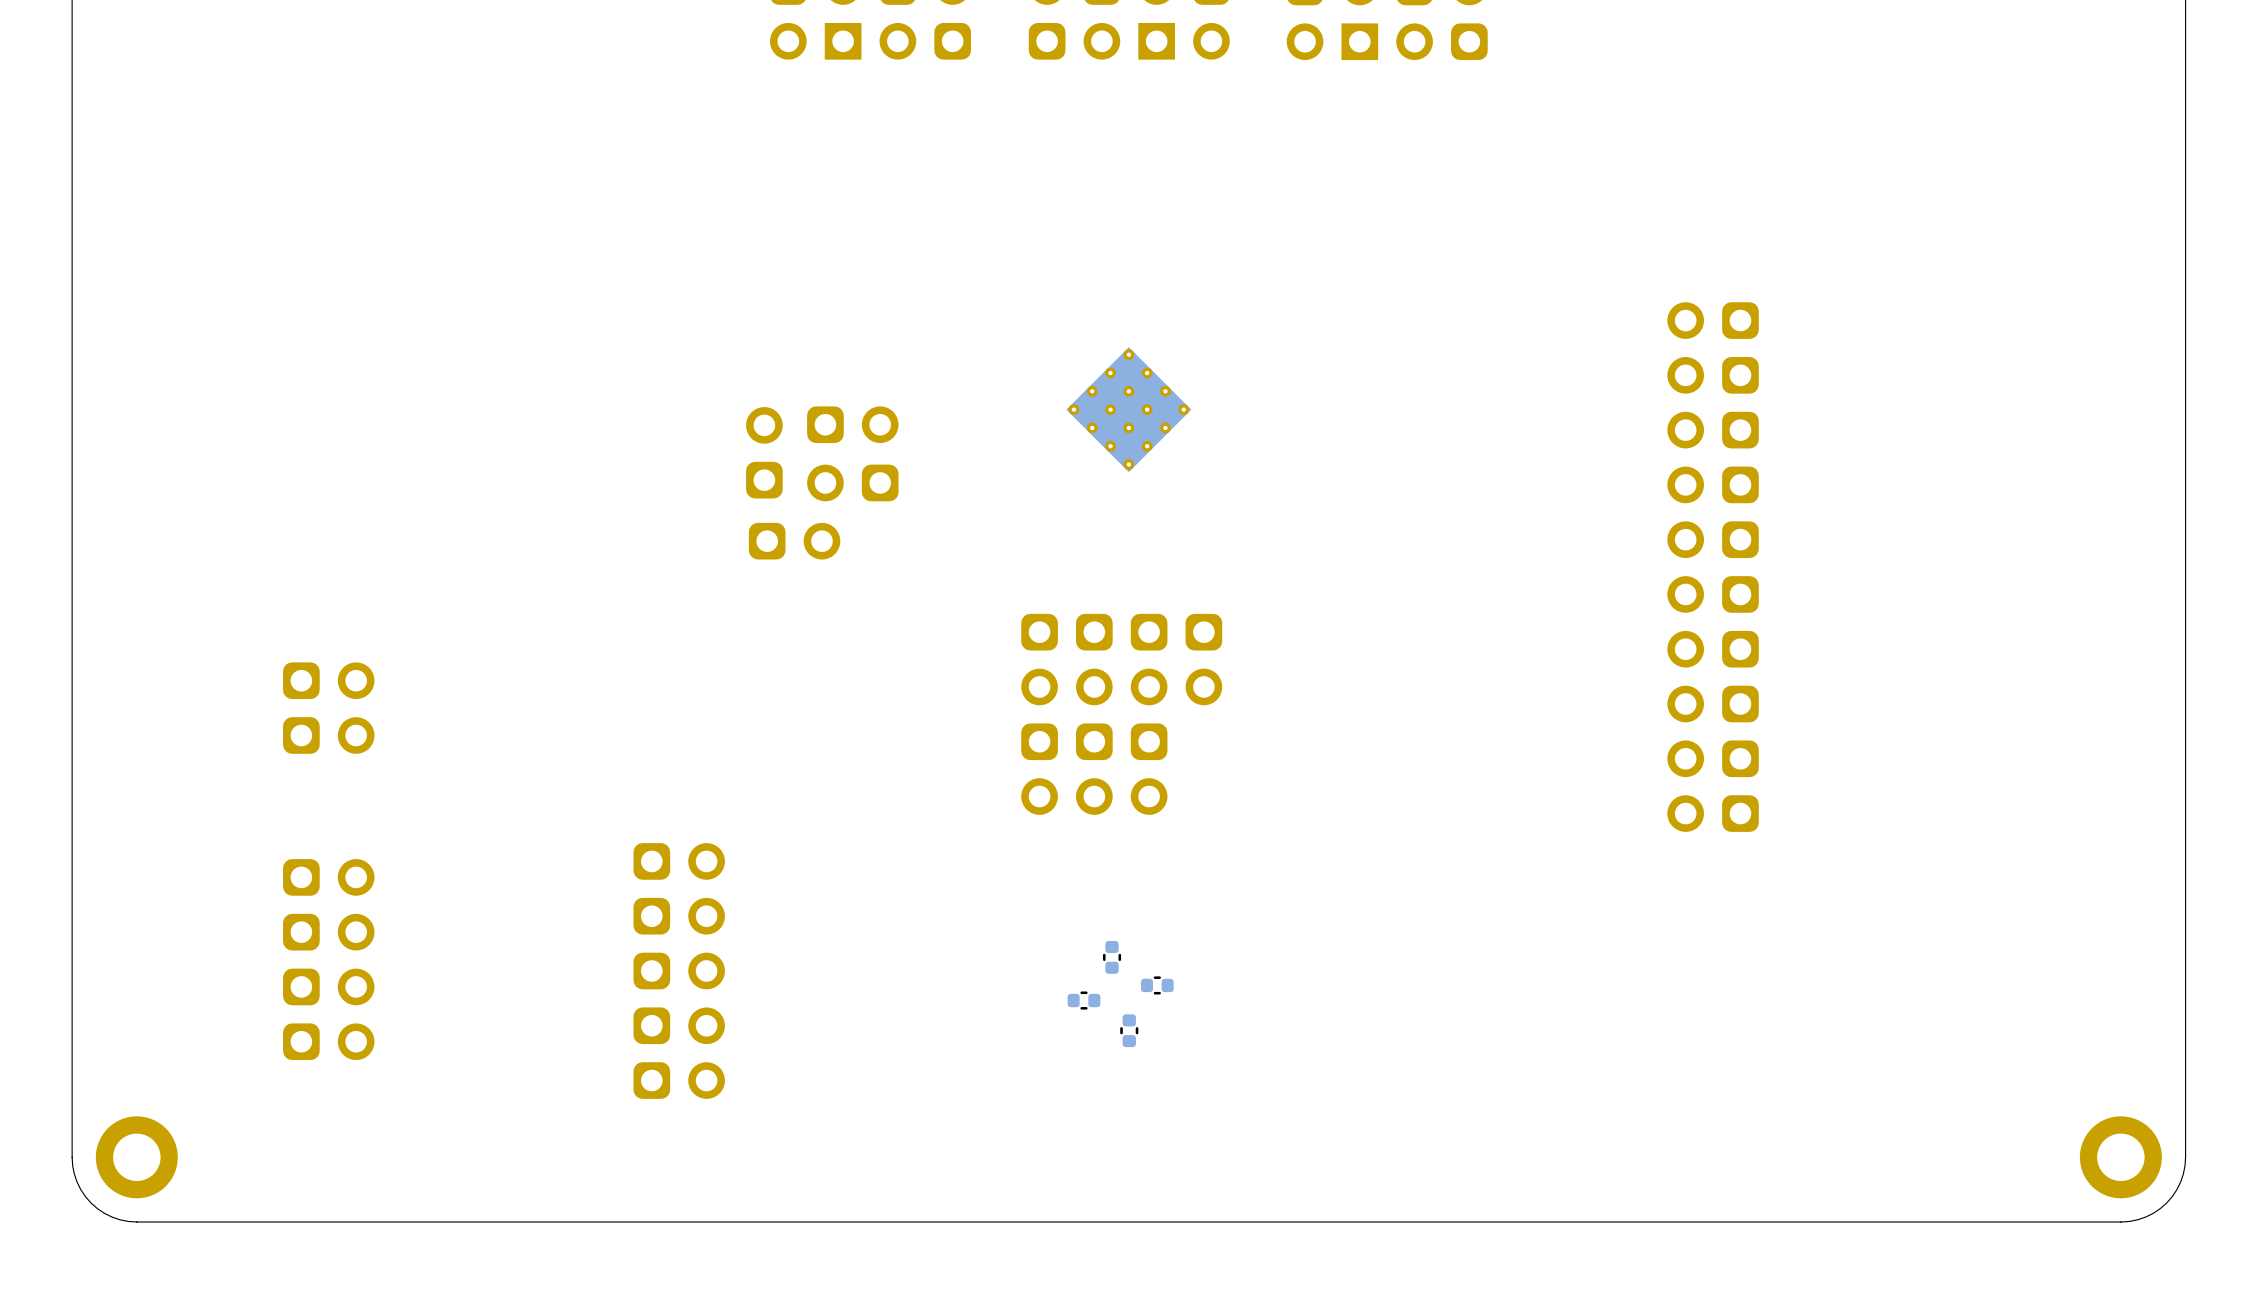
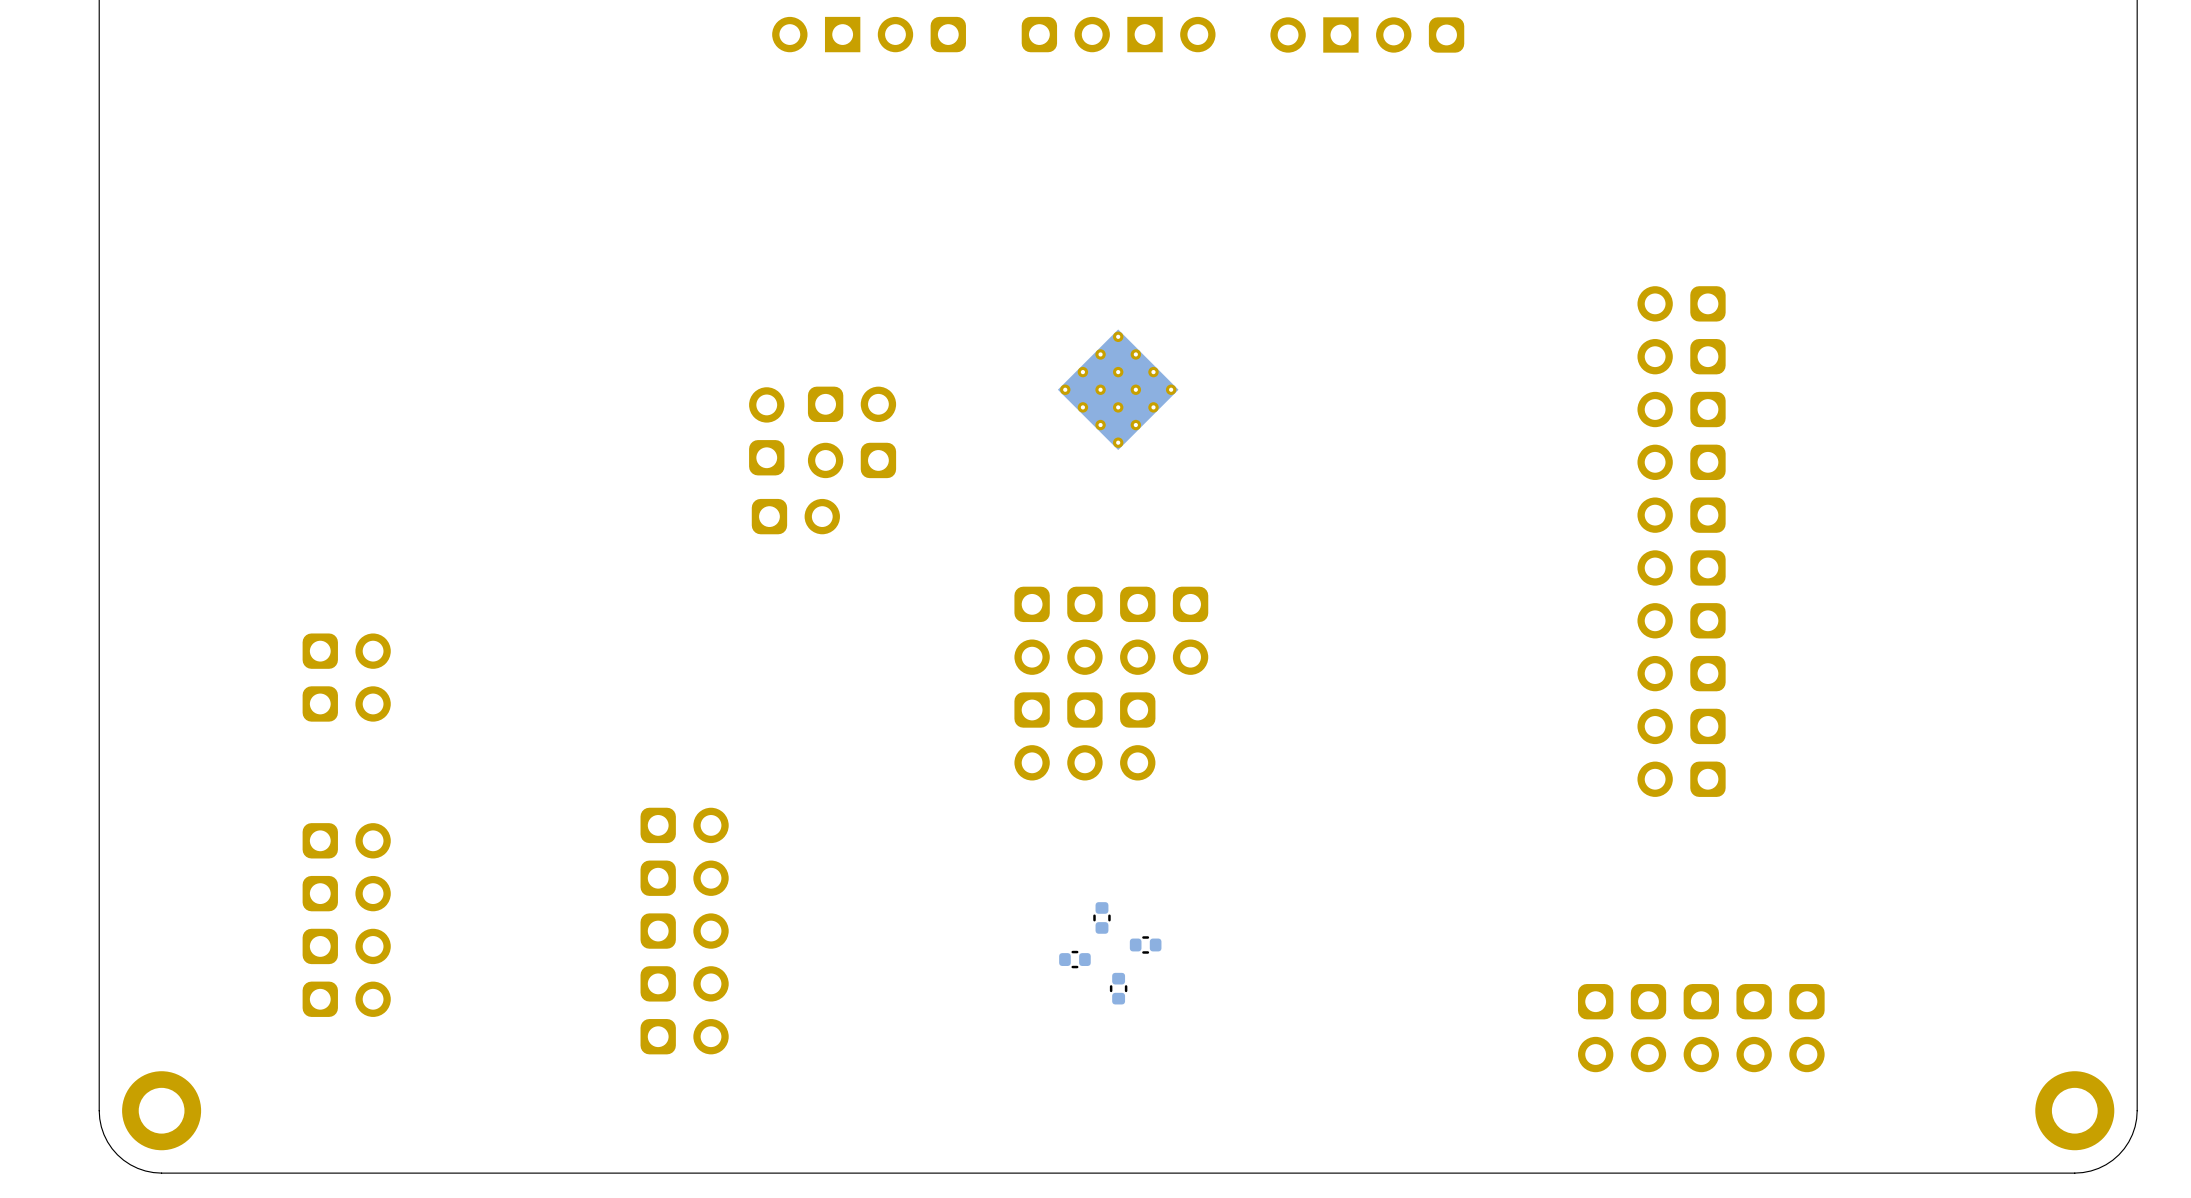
part: none -> (1595, 1028)
part: none -> (1648, 1028)
part: none -> (1701, 1028)
part: none -> (1754, 1028)
part: none -> (1806, 1028)

